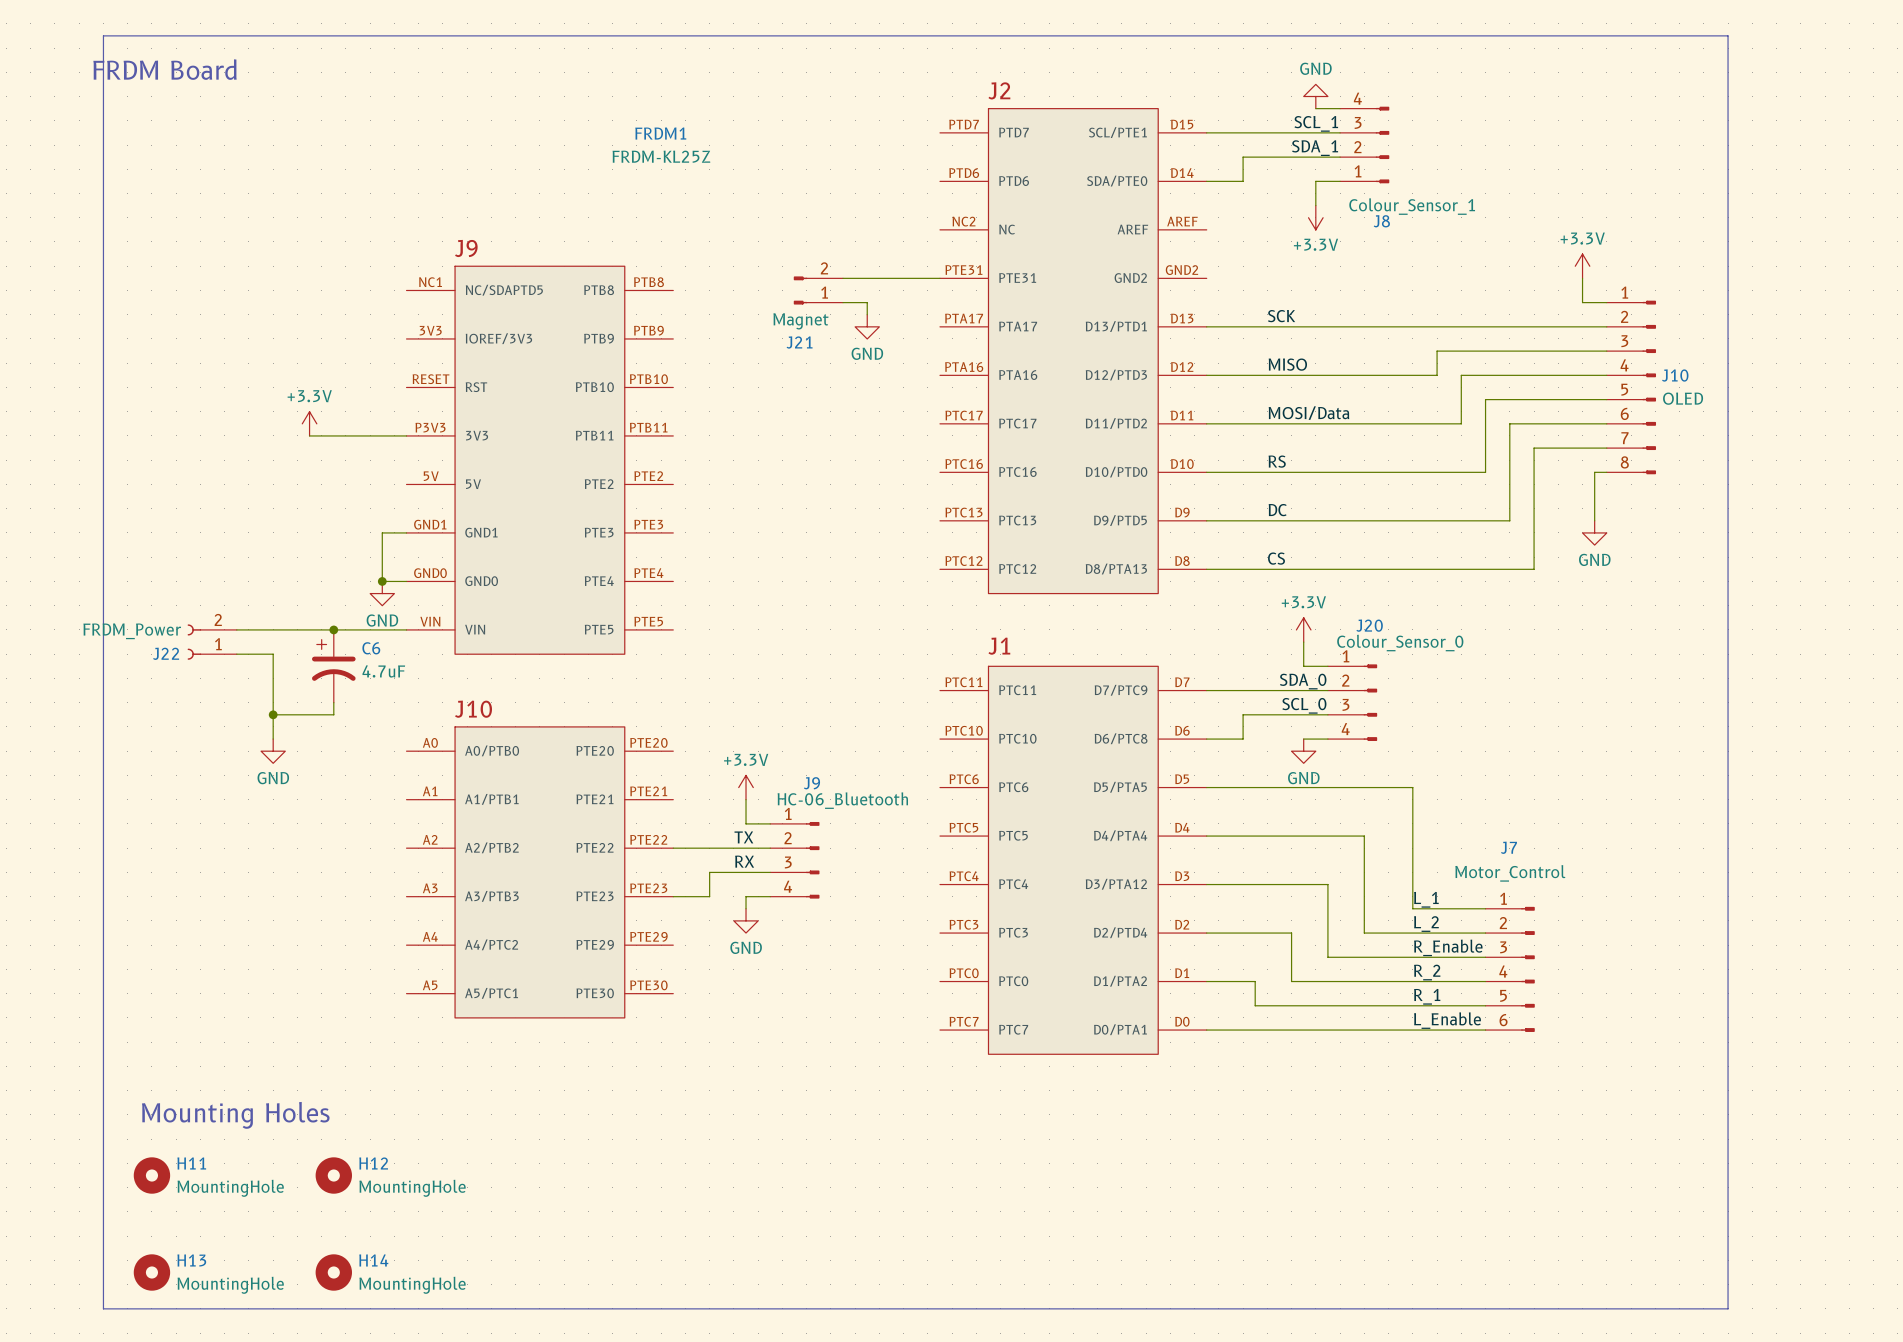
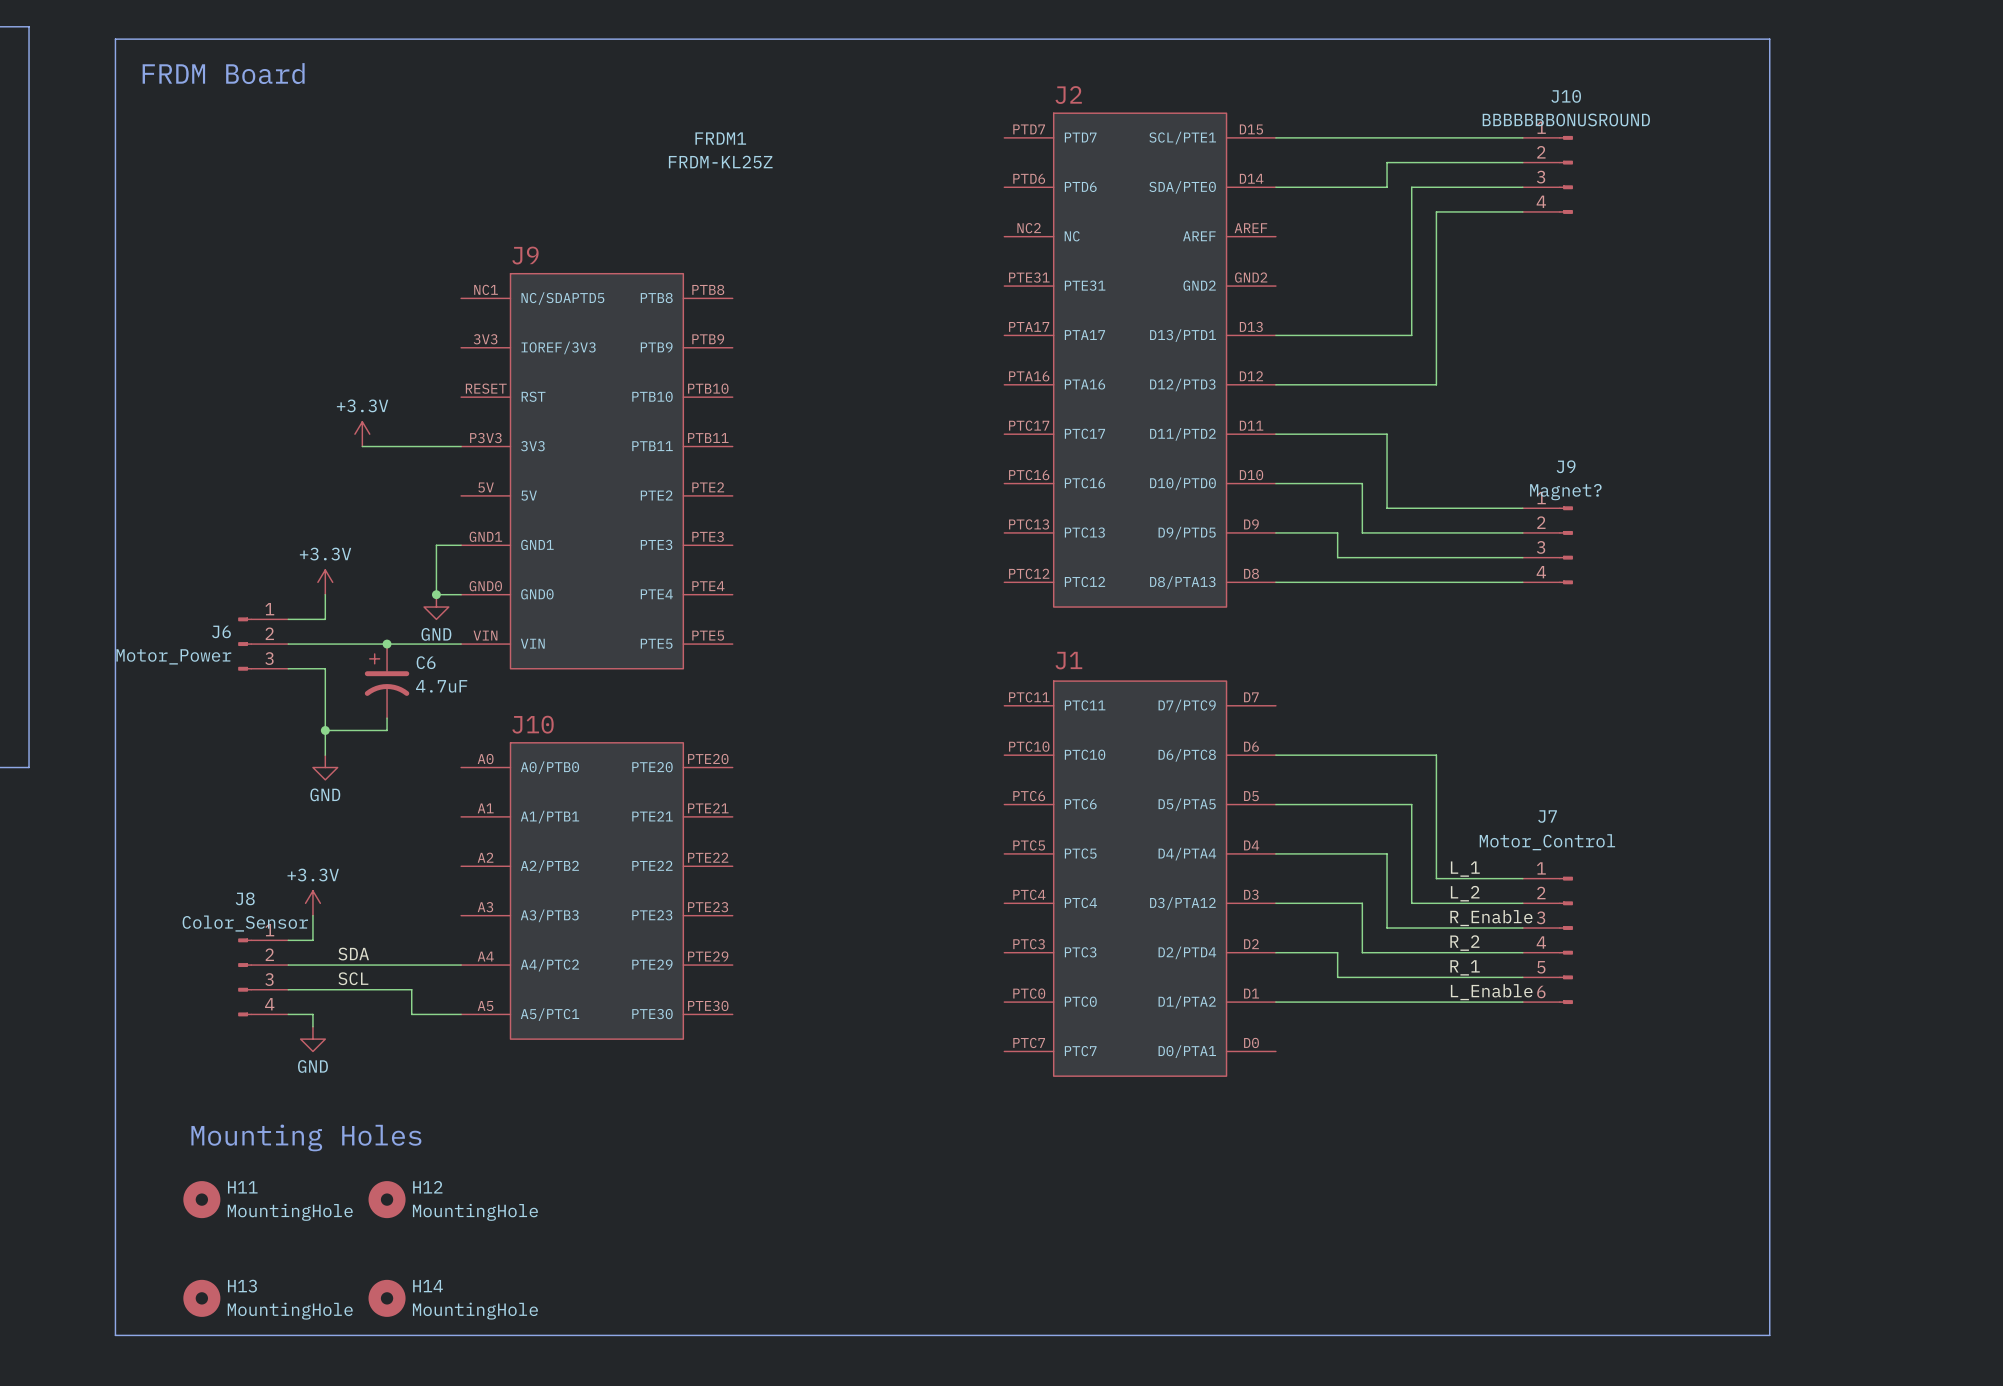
line: (103, 35) (103, 1308) -> (152, 39) (115, 39) (115, 1335) (152, 1335)
line: (1691, 35) (1728, 35) (1728, 1308) (1691, 1308) -> (1769, 39) (1769, 1335)
power symbol: GND (1315, 96) -> none
wire: (1315, 108) (1340, 108) -> none
label: SCL_1 (1316, 123) -> none
wire: none -> (1411, 137) (1522, 137)
J8 position: (1364, 145) -> (263, 977)
J8 rotation: 0° (1382, 145) -> 180° (245, 977)
label: SDA_1 (1315, 148) -> none
wire: (1315, 157) (1243, 157) (1243, 181) -> (1387, 162) (1387, 187) (1312, 187)
wire: none -> (1411, 162) (1522, 162)
wire: (1340, 181) (1315, 181) (1315, 205) -> none
J8 value: Colour_Sensor_1 (1412, 206) -> Color_Sensor (245, 923)
power symbol: +3.3V (1315, 217) -> none
power symbol: +3.3V (1582, 266) -> none
wire: (842, 278) (939, 278) -> none
wire: (1582, 278) (1582, 302) (1606, 302) -> none
J21: Magnet (818, 290) -> none
J10 symbol: [1606, 300, 1657, 475] -> [1522, 135, 1573, 214]
wire: (842, 302) (867, 302) (867, 314) -> none
label: SCK (1281, 316) -> none
power symbol: GND (867, 326) -> none
wire: (1340, 326) (1606, 326) -> (1411, 335) (1411, 187) (1522, 187)
wire: (1606, 351) (1437, 351) (1437, 375) (1364, 375) -> (1522, 211) (1436, 211) (1436, 384)
label: MISO (1287, 364) -> none
wire: (1606, 375) (1461, 375) (1461, 423) (1315, 423) -> (1522, 508) (1387, 508) (1387, 434)
J10 name position: J10 (1675, 375) -> J10 (1566, 96)
J10 value: OLED (1683, 398) -> BBBBBBBONUSROUND (1566, 119)
wire: (1606, 399) (1485, 399) (1485, 472) (1291, 472) -> none
label: MOSI/Data (1308, 413) -> none
wire: (1606, 423) (1509, 423) (1509, 520) (1449, 520) -> none
wire: (1606, 448) (1534, 448) (1534, 569) (1449, 569) -> none
label: RS (1277, 461) -> none
wire: (1606, 472) (1594, 472) (1594, 520) -> none
label: DC (1277, 510) -> none
wire: (1267, 520) (1291, 520) -> (1362, 483) (1362, 532)
wire: none -> (1337, 532) (1337, 557) (1522, 557)
power symbol: GND (1594, 532) -> none
label: CS (1276, 558) -> none
power symbol: none -> +3.3V (325, 582)
wire: none -> (325, 594) (325, 619) (288, 619)
J6: none -> Motor_Power (263, 644)
power symbol: +3.3V (1303, 629) -> none
J22: FRDM_Power (212, 642) -> none
wire: (1303, 642) (1303, 666) (1327, 666) -> none
label: SDA_0 (1303, 681) -> none
wire: (1206, 690) (1327, 690) -> none
J20: Colour_Sensor_0 (1352, 702) -> none
label: SCL_0 (1304, 705) -> none
wire: (1327, 714) (1243, 714) (1243, 739) -> (1374, 755) (1312, 755)
wire: none -> (1399, 755) (1436, 755) (1436, 853)
power symbol: GND (1303, 751) -> none
power symbol: +3.3V (746, 787) -> none
wire: (1340, 787) (1412, 787) (1412, 908) -> (1411, 804) (1411, 903) (1522, 903)
wire: (746, 799) (746, 823) (770, 823) -> none
J9 value: HC-06_Bluetooth (842, 800) -> Magnet? (1565, 492)
wire: (1315, 836) (1364, 836) -> (1387, 853) (1387, 928) (1485, 928)
label: TX (743, 837) -> none
wire: (673, 848) (770, 848) -> none
J9 position: (794, 860) -> (1547, 545)
wire: (1364, 860) (1364, 933) -> (1436, 878) (1522, 878)
label: RX (744, 861) -> none
wire: (770, 872) (709, 872) (709, 896) (673, 896) -> none
power symbol: none -> +3.3V (312, 903)
wire: (1291, 884) (1327, 884) (1327, 957) -> (1362, 903) (1362, 952) (1436, 952)
wire: none -> (312, 915) (312, 940) (288, 940)
wire: (770, 896) (746, 896) (746, 908) -> none
label position: L_1 (1426, 899) -> L_1 (1465, 869)
power symbol: GND (746, 920) -> none
label position: L_2 (1426, 924) -> L_2 (1465, 893)
wire: (1267, 933) (1291, 933) (1291, 981) -> (1337, 952) (1337, 977) (1399, 977)
label: none -> SDA (353, 954)
wire: none -> (288, 965) (461, 965)
label position: R_Enable (1448, 947) -> R_Enable (1491, 918)
label: none -> SCL (353, 978)
wire: none -> (288, 989) (411, 989) (411, 1014) (461, 1014)
J7 position: (1510, 969) -> (1547, 940)
label position: R_2 (1427, 972) -> R_2 (1464, 943)
wire: (1255, 981) (1255, 1005) (1485, 1005) -> (1325, 1002) (1362, 1002)
wire: none -> (288, 1014) (312, 1014) (312, 1026)
label position: R_1 (1427, 996) -> R_1 (1465, 967)
power symbol: none -> GND (312, 1039)
label position: L_Enable (1447, 1020) -> L_Enable (1491, 992)
wire: (1206, 1030) (1485, 1030) -> none

